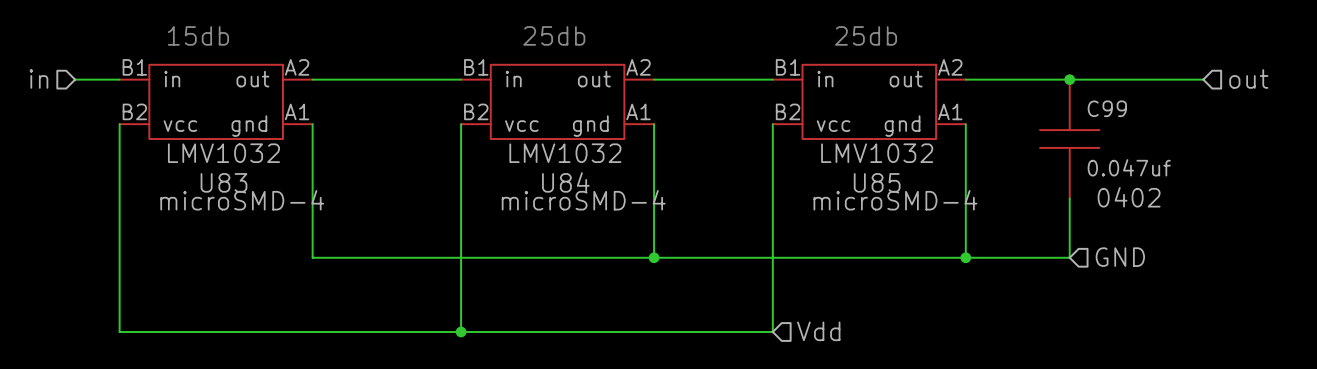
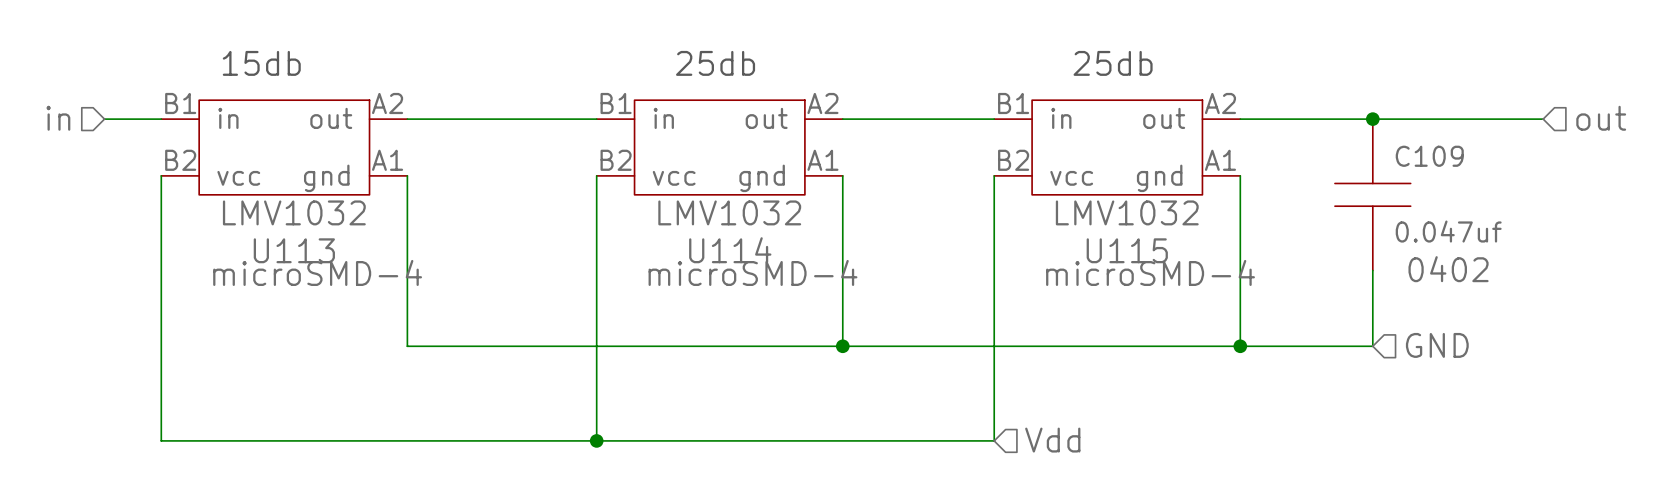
C99 name: C99 (1107, 108) -> C109 (1429, 156)
U83 name: U83 (223, 182) -> U113 (294, 250)
U84 name: U84 (565, 182) -> U114 (730, 250)
U85 name: U85 (877, 182) -> U115 (1127, 250)

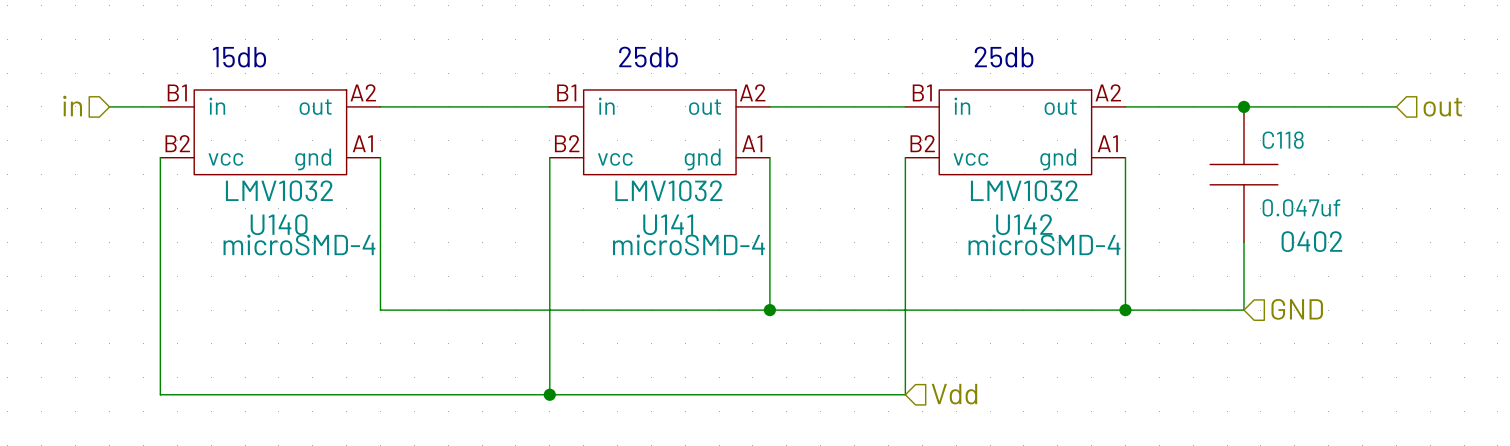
C109 name: C109 (1429, 156) -> C118 (1283, 140)
U113 name: U113 (294, 250) -> U140 (279, 224)
U114 name: U114 (730, 250) -> U141 (668, 224)
U115 name: U115 (1127, 250) -> U142 (1024, 224)

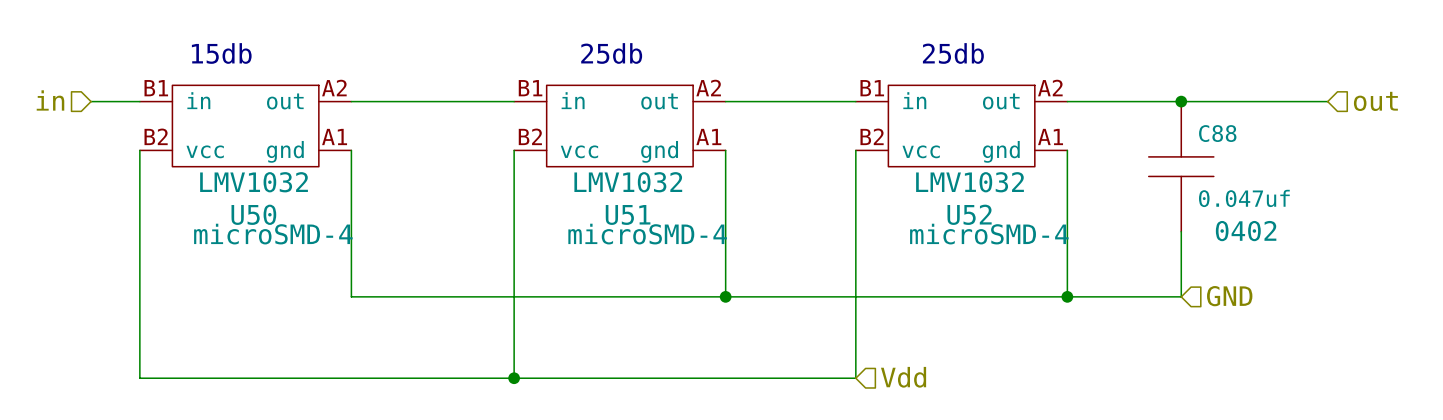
C118 name: C118 (1283, 140) -> C88 (1217, 133)
U140 name: U140 (279, 224) -> U50 (253, 214)
U141 name: U141 (668, 224) -> U51 (628, 214)
U142 name: U142 (1024, 224) -> U52 (969, 214)

